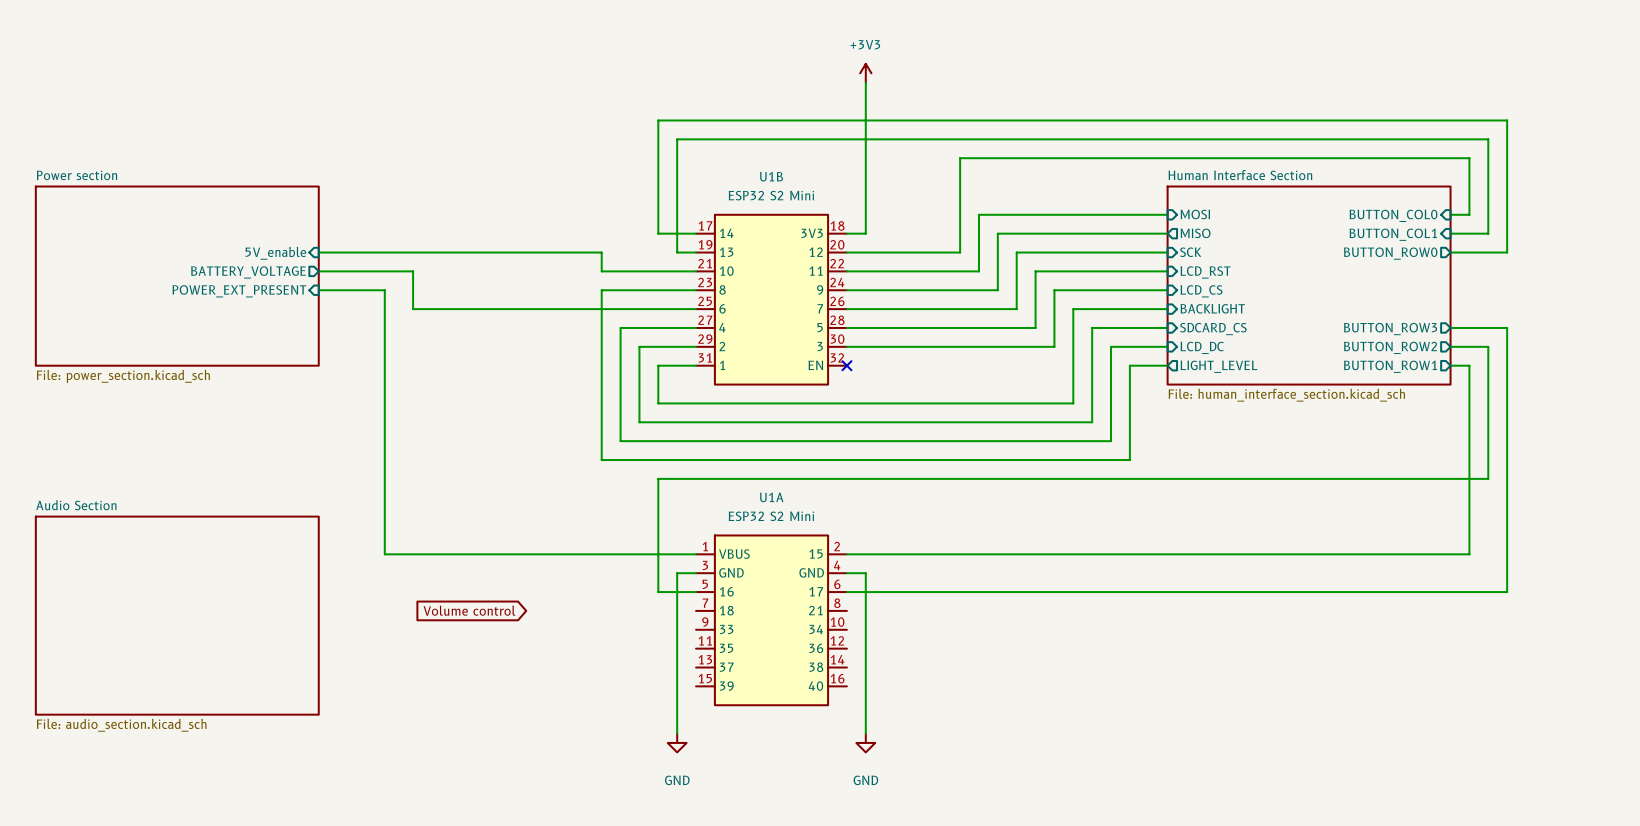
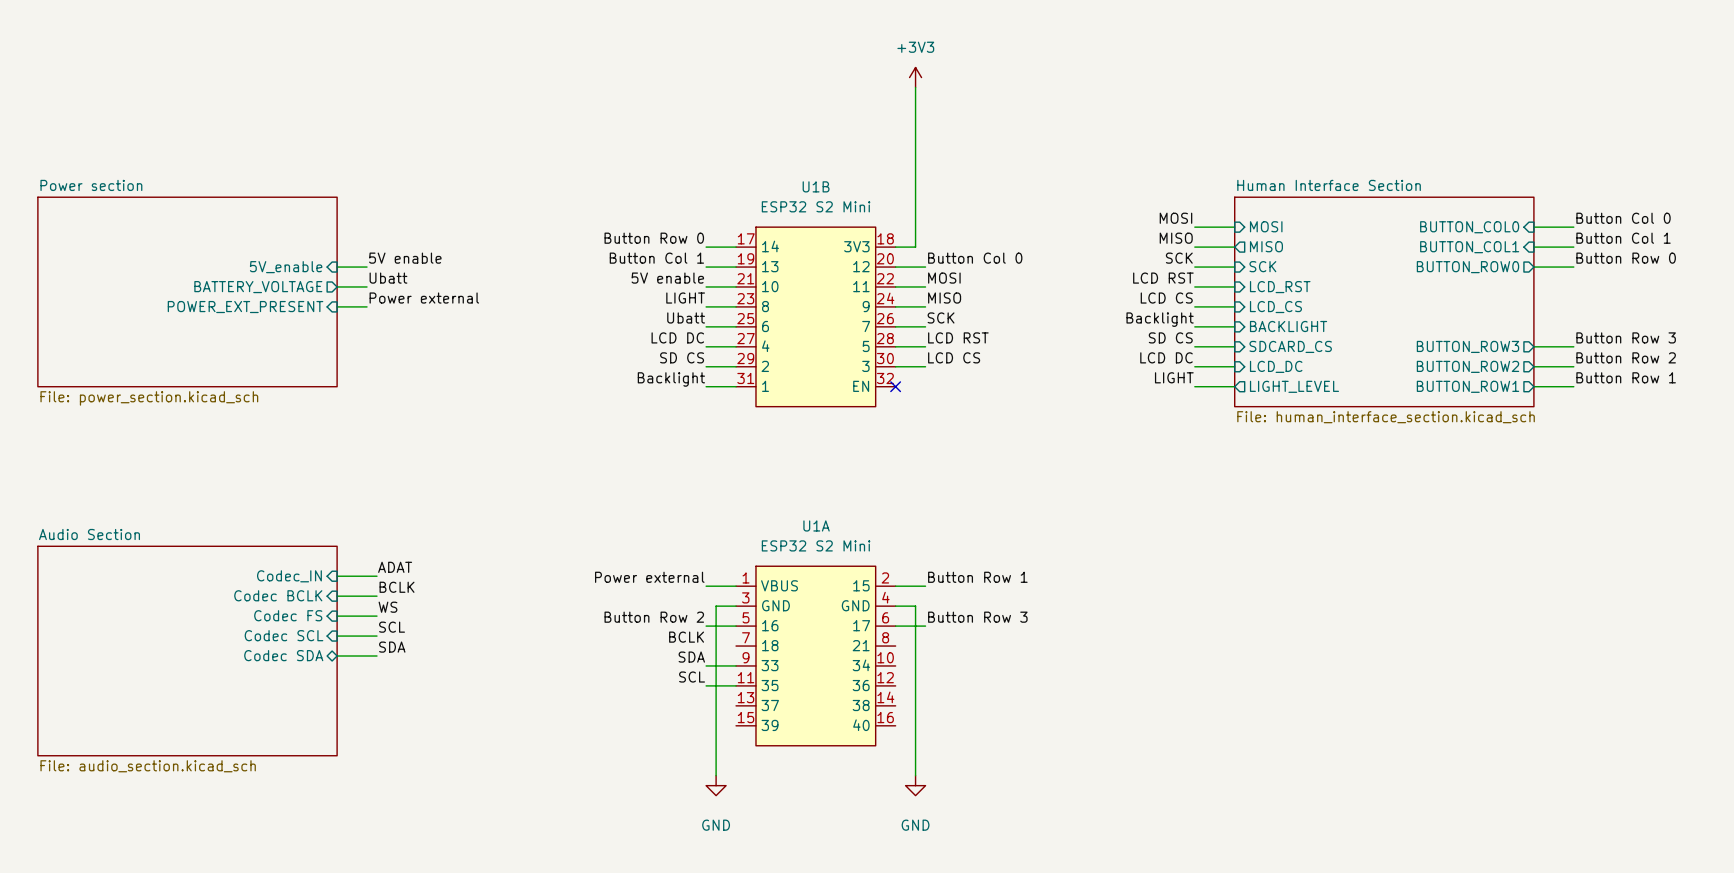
label: none -> MOSI (1175, 218)
label: none -> Button Col 0 (1623, 218)
wire: (1129, 214) (978, 214) (978, 271) (875, 271) -> none
wire: (1469, 214) (1469, 158) (960, 158) (960, 252) (875, 252) -> (1553, 227) (1573, 227)
label: none -> Button Col 1 (1623, 238)
label: none -> Button Row 0 (654, 238)
label: none -> MISO (1176, 238)
wire: (667, 233) (658, 233) (658, 120) (1507, 120) (1507, 252) (1488, 252) -> none
wire: (1129, 233) (997, 233) (997, 290) (875, 290) -> none
wire: (1488, 233) (1488, 139) (677, 139) (677, 252) -> (706, 267) (716, 267)
label: none -> 5V enable (405, 258)
label: none -> Button Col 1 (656, 258)
label: none -> Button Col 0 (975, 258)
label: none -> SCK (1179, 258)
label: none -> Button Row 0 (1626, 258)
wire: (347, 252) (601, 252) (601, 271) (667, 271) -> none
wire: (1129, 252) (1016, 252) (1016, 309) (875, 309) -> none
label: none -> Ubatt (388, 278)
label: none -> 5V enable (667, 278)
label: none -> MOSI (944, 278)
label: none -> LCD RST (1163, 278)
wire: (347, 271) (413, 271) (413, 309) (667, 309) -> none
wire: (1129, 271) (1035, 271) (1035, 327) (875, 327) -> none
label: none -> Power external (424, 298)
label: none -> LIGHT (685, 298)
label: none -> MISO (944, 298)
label: none -> LCD CS (1166, 298)
wire: (347, 290) (384, 290) (384, 554) (667, 554) -> none
wire: (667, 290) (601, 290) (601, 460) (1129, 460) (1129, 365) -> none
wire: (1129, 290) (1054, 290) (1054, 346) (875, 346) -> none
label: none -> Ubatt (686, 317)
label: none -> SCK (941, 317)
label: none -> Backlight (1160, 319)
wire: (1129, 309) (1073, 309) (1073, 403) (658, 403) (658, 365) (667, 365) -> none
label: none -> LCD DC (677, 337)
label: none -> LCD RST (958, 337)
label: none -> SD CS (1170, 337)
label: none -> Button Row 3 (1626, 337)
wire: (667, 327) (620, 327) (620, 441) (1111, 441) (1111, 346) (1129, 346) -> none
wire: (1129, 327) (1092, 327) (1092, 422) (639, 422) (639, 346) (667, 346) -> none
wire: (1488, 327) (1507, 327) (1507, 592) (875, 592) -> none
label: none -> SD CS (682, 357)
label: none -> LCD CS (954, 357)
label: none -> LCD DC (1166, 357)
label: none -> Button Row 2 (1626, 357)
wire: (1488, 346) (1488, 478) (658, 478) (658, 592) (667, 592) -> none
label: none -> LIGHT (1174, 377)
label: none -> Button Row 1 (1626, 377)
label: none -> Backlight (671, 379)
wire: (1469, 365) (1469, 554) (875, 554) -> (1553, 386) (1573, 386)
label: none -> ADAT (395, 567)
wire: none -> (337, 576) (376, 576)
sheet pin: none -> Codec_IN (289, 576)
label: none -> Power external (649, 577)
label: none -> Button Row 1 (977, 577)
label: none -> BCLK (397, 587)
sheet pin: none -> Codec BCLK (278, 595)
wire: none -> (337, 596) (376, 596)
label: none -> WS (387, 607)
sheet pin: none -> Codec FS (288, 615)
wire: none -> (337, 616) (376, 616)
label: none -> Button Row 2 (654, 617)
label: none -> Button Row 3 (977, 617)
label: none -> SCL (392, 627)
sheet pin: none -> Codec SCL (283, 635)
wire: none -> (337, 636) (376, 636)
label: none -> BCLK (686, 637)
global label: Volume control (469, 610) -> none
label: none -> SDA (392, 647)
sheet pin: none -> Codec SDA (283, 655)
wire: none -> (337, 656) (376, 656)
label: none -> SDA (691, 657)
wire: none -> (706, 665) (736, 665)
label: none -> SCL (692, 677)
wire: none -> (706, 685) (736, 685)

